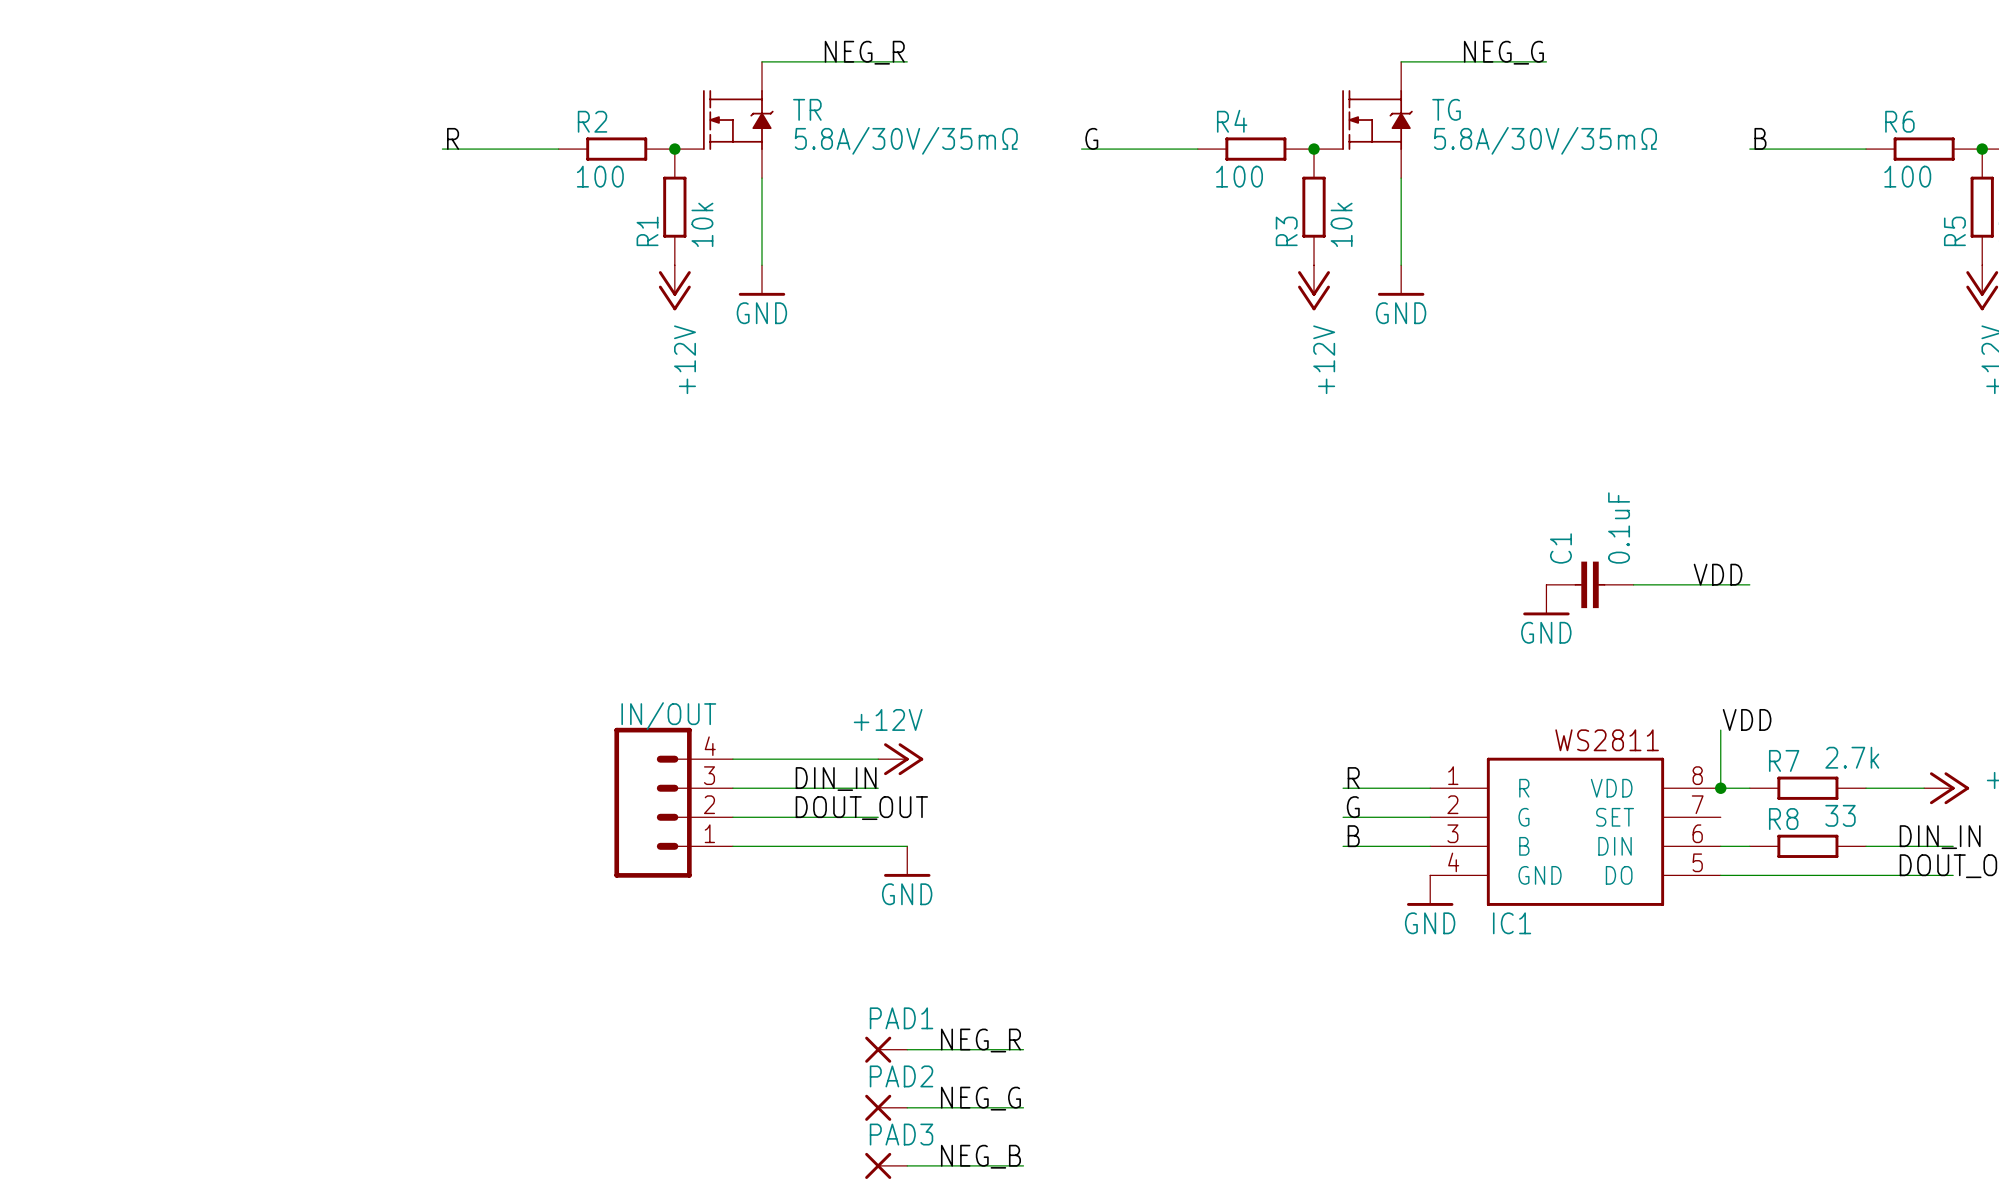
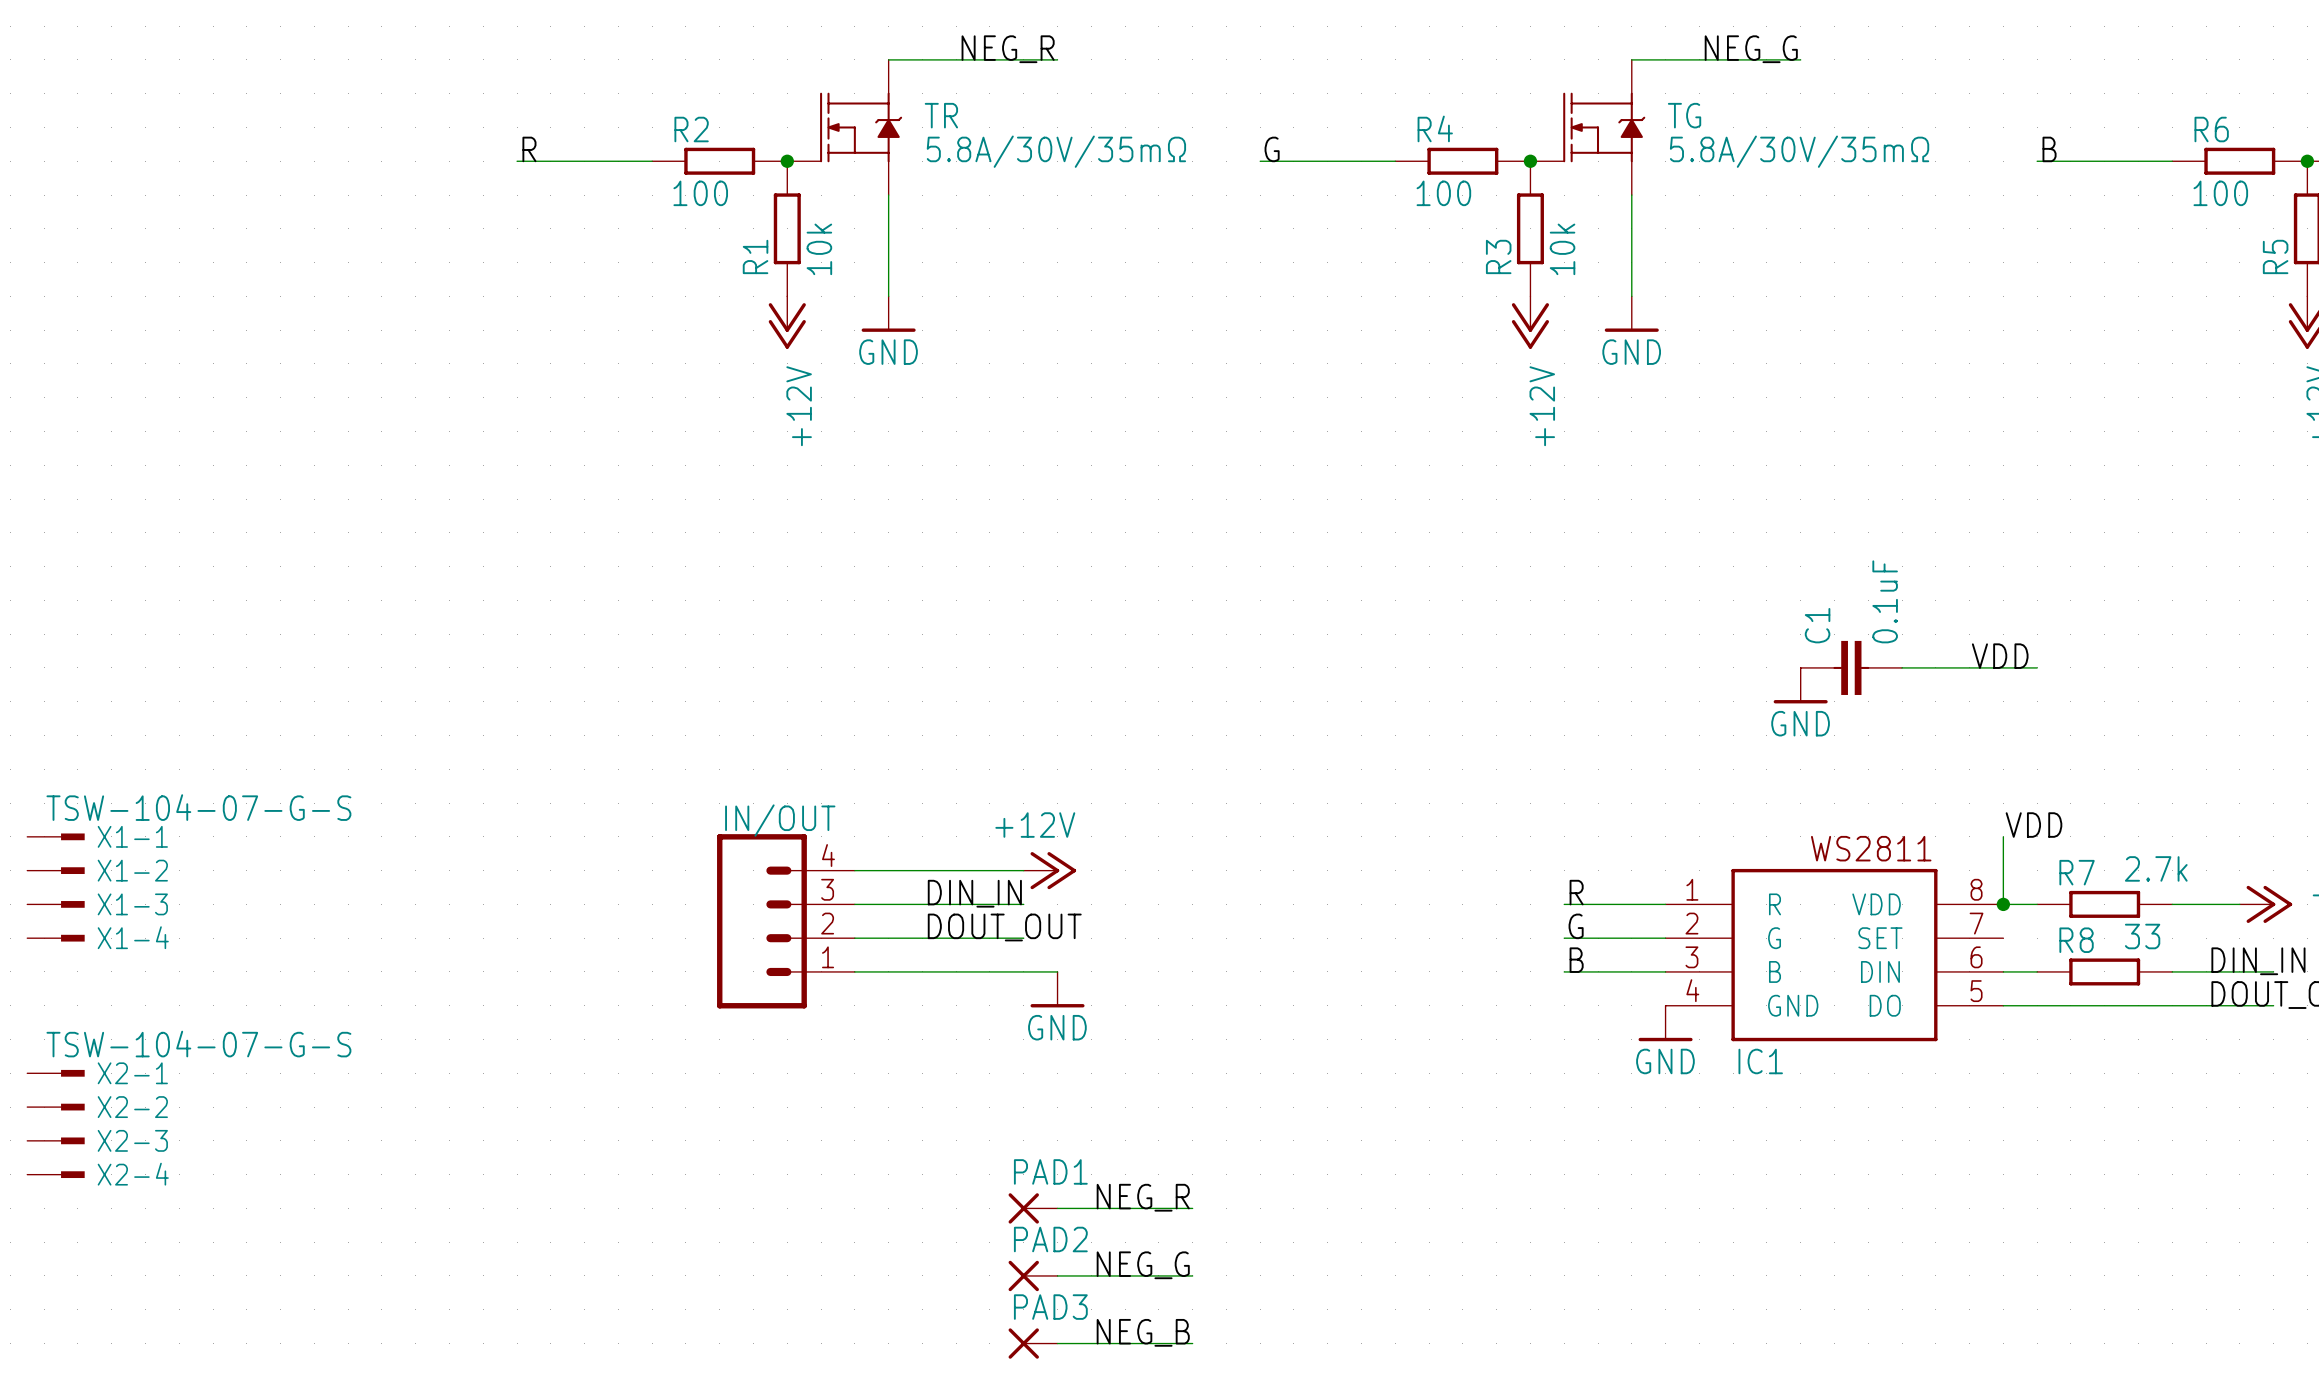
X1-1: none -> TSW-104-07-G-S (55, 836)
X1-2: none -> (55, 870)
X1-3: none -> (55, 904)
X1-4: none -> (55, 938)
X2-1: none -> TSW-104-07-G-S (55, 1073)
X2-2: none -> (55, 1107)
X2-3: none -> (55, 1140)
X2-4: none -> (55, 1174)

